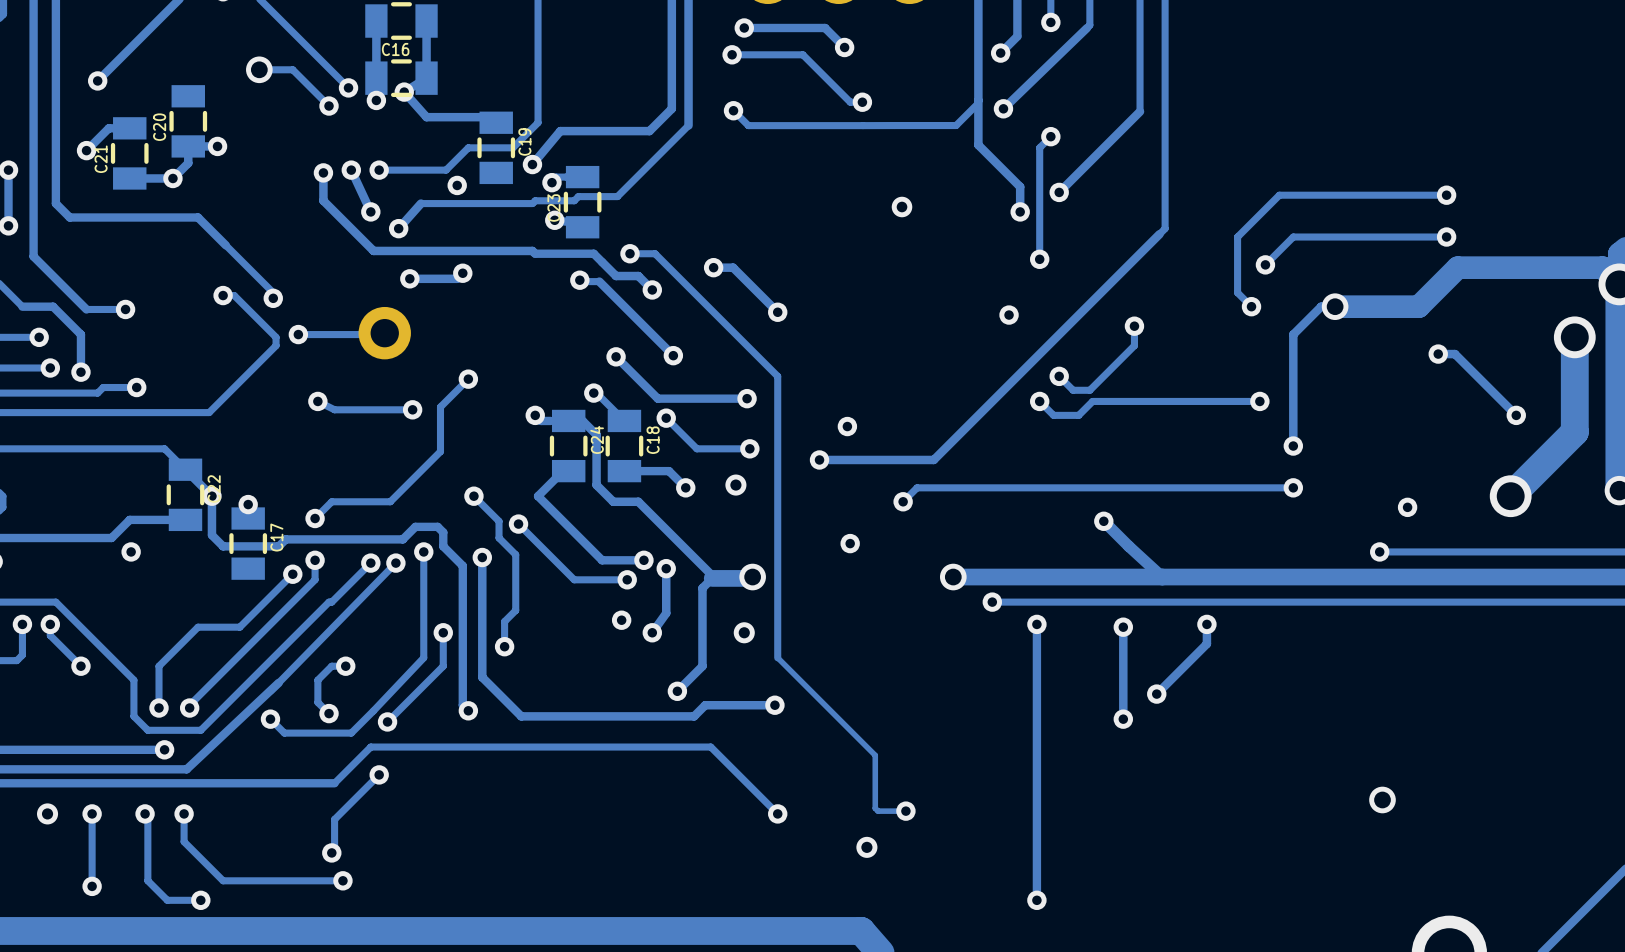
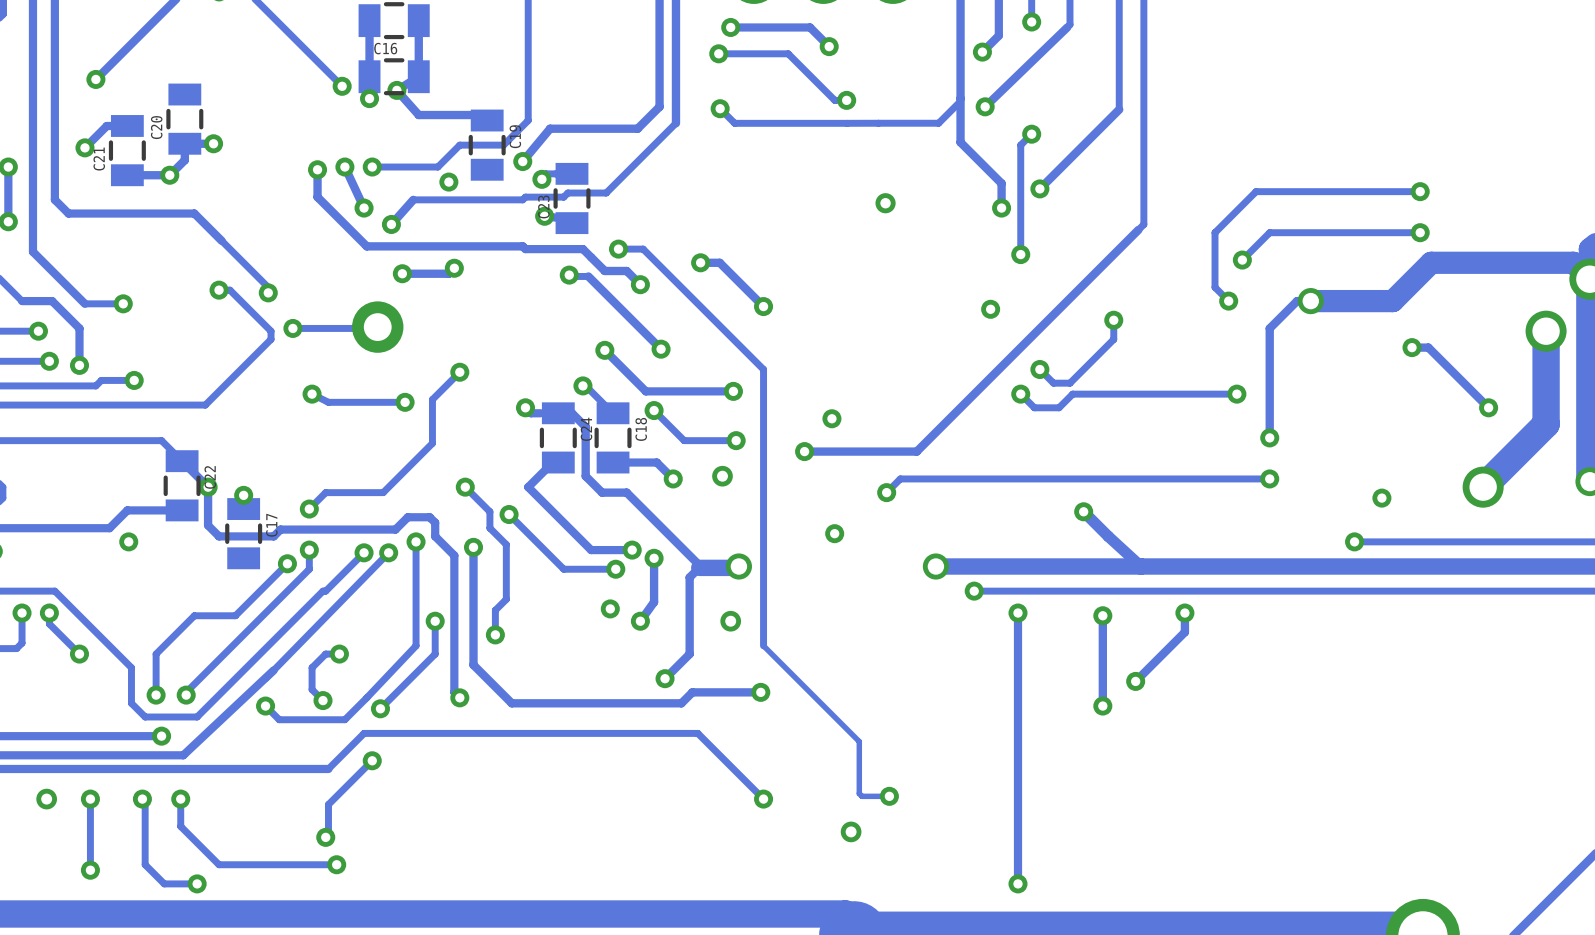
track: (259, 69) (292, 69) (329, 106) -> none
via: (259, 69) -> none
via: (329, 106) -> none
via: (1382, 799) -> none

